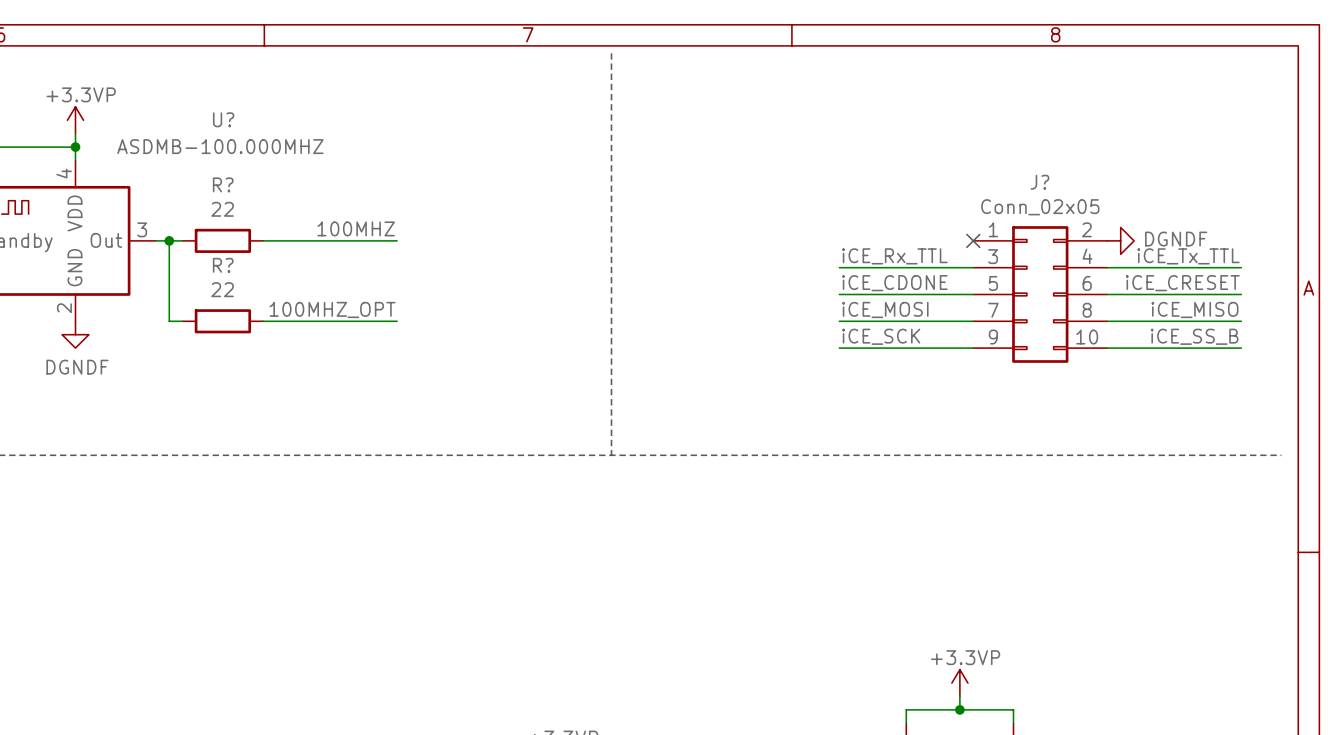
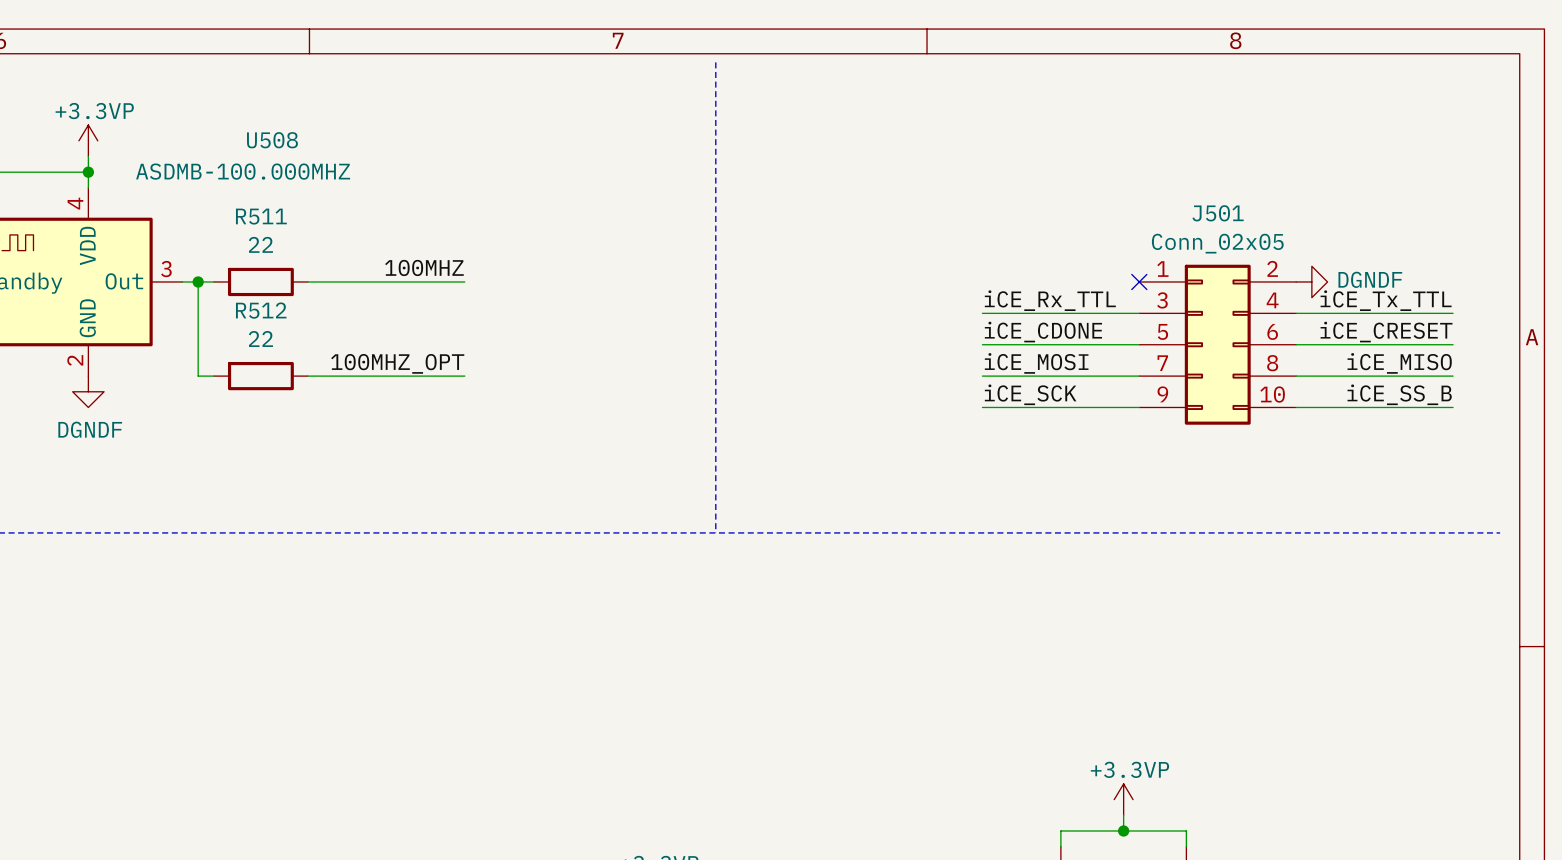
U? name: U? (223, 119) -> U508 (272, 140)
J? name: J? (1039, 182) -> J501 (1218, 213)
R? name: R? (223, 184) -> R511 (261, 216)
R? name: R? (223, 265) -> R512 (261, 310)

